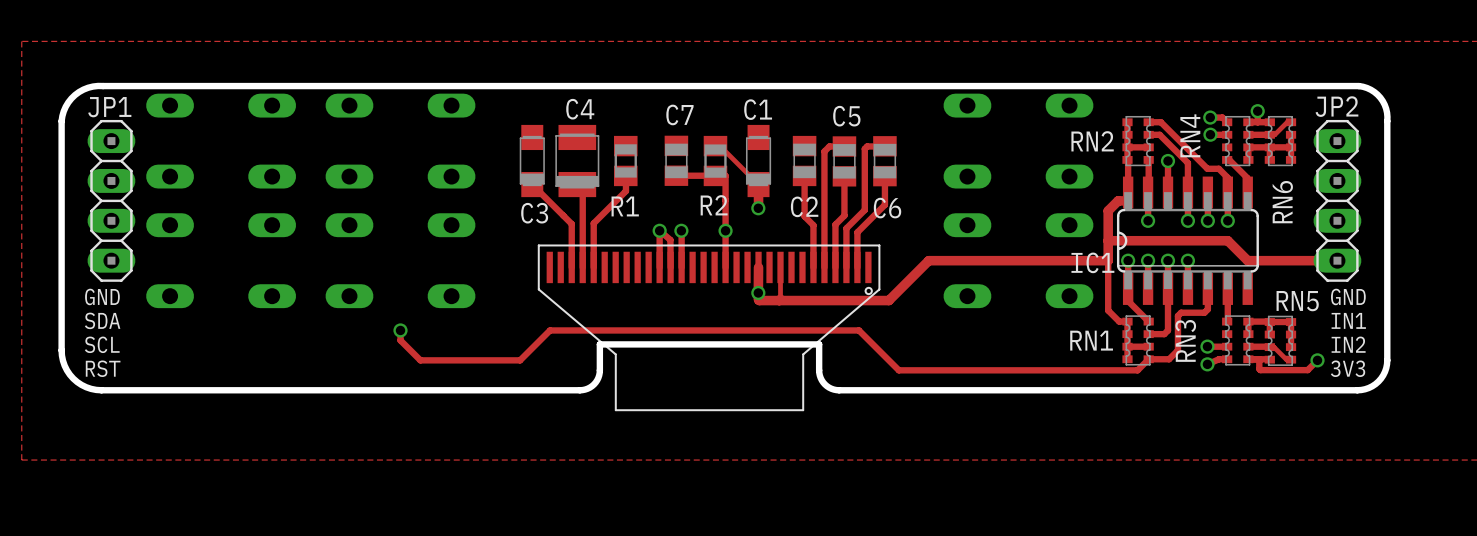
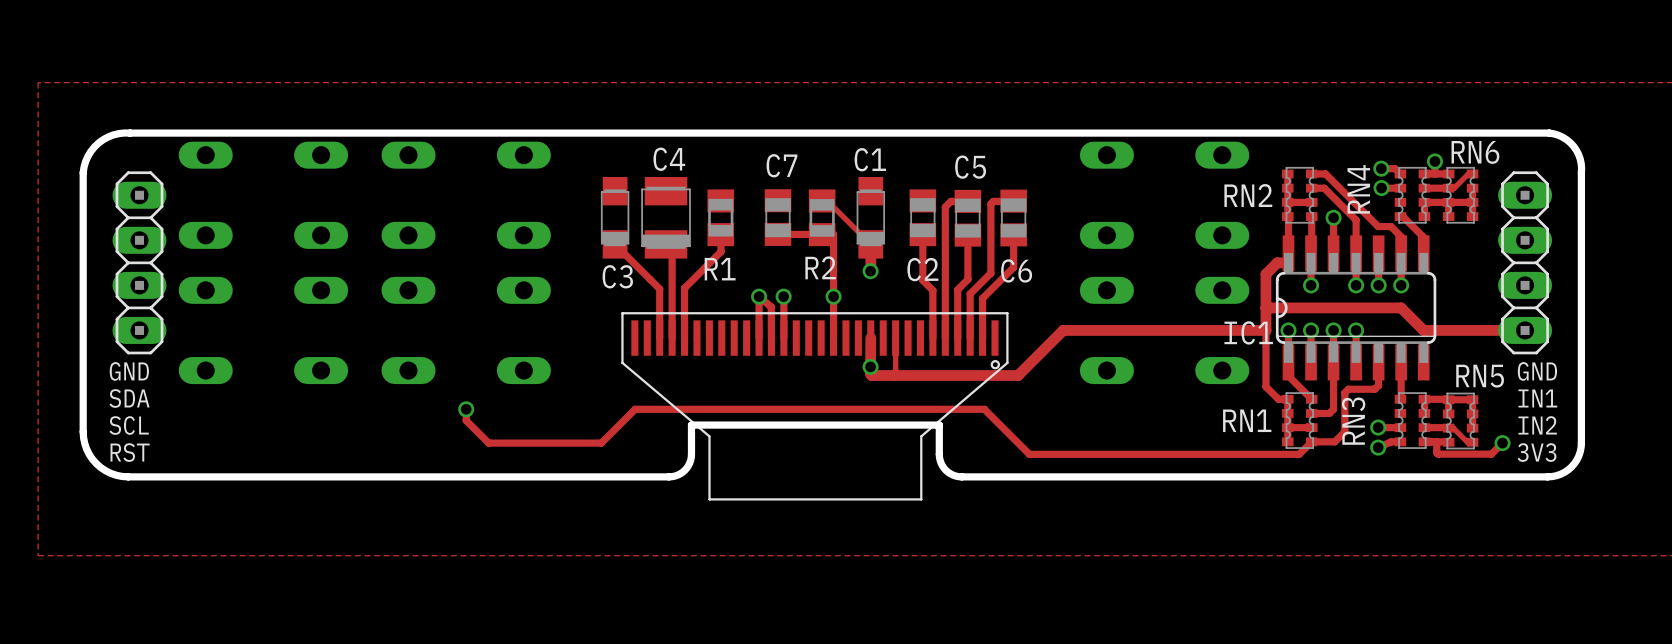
JP2 name: JP2 (1336, 106) -> none
JP1 name: JP1 (109, 107) -> none
RN6 name rotation: 0° (1282, 202) -> 90° clockwise (1475, 152)
RN6 name position: RN6 (1282, 202) -> RN6 (1475, 152)

